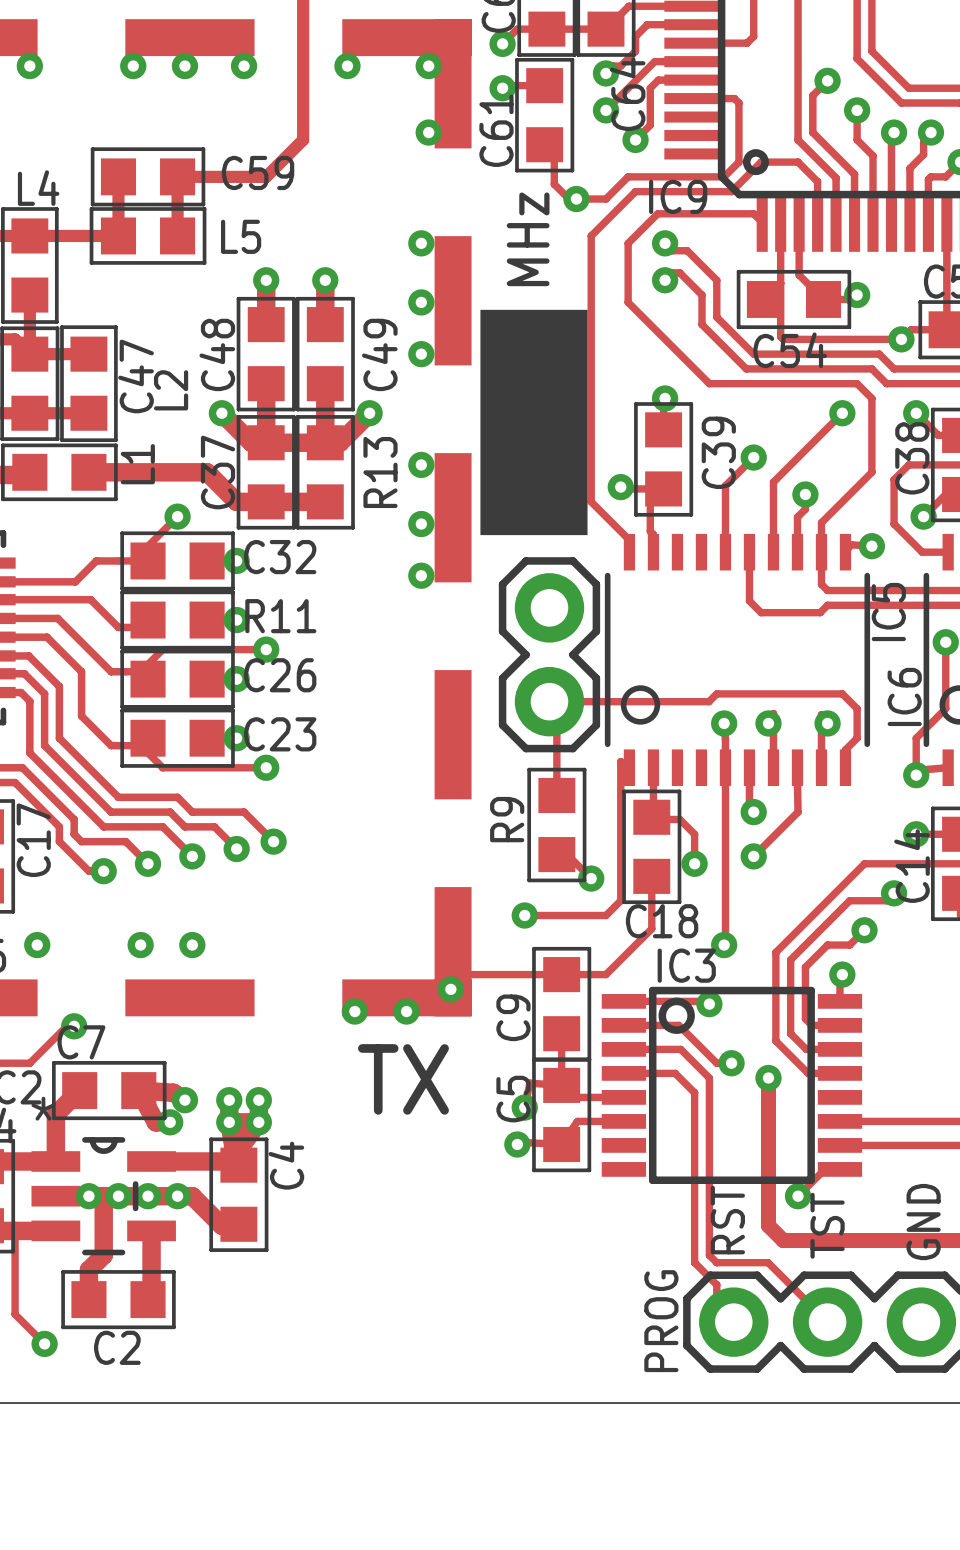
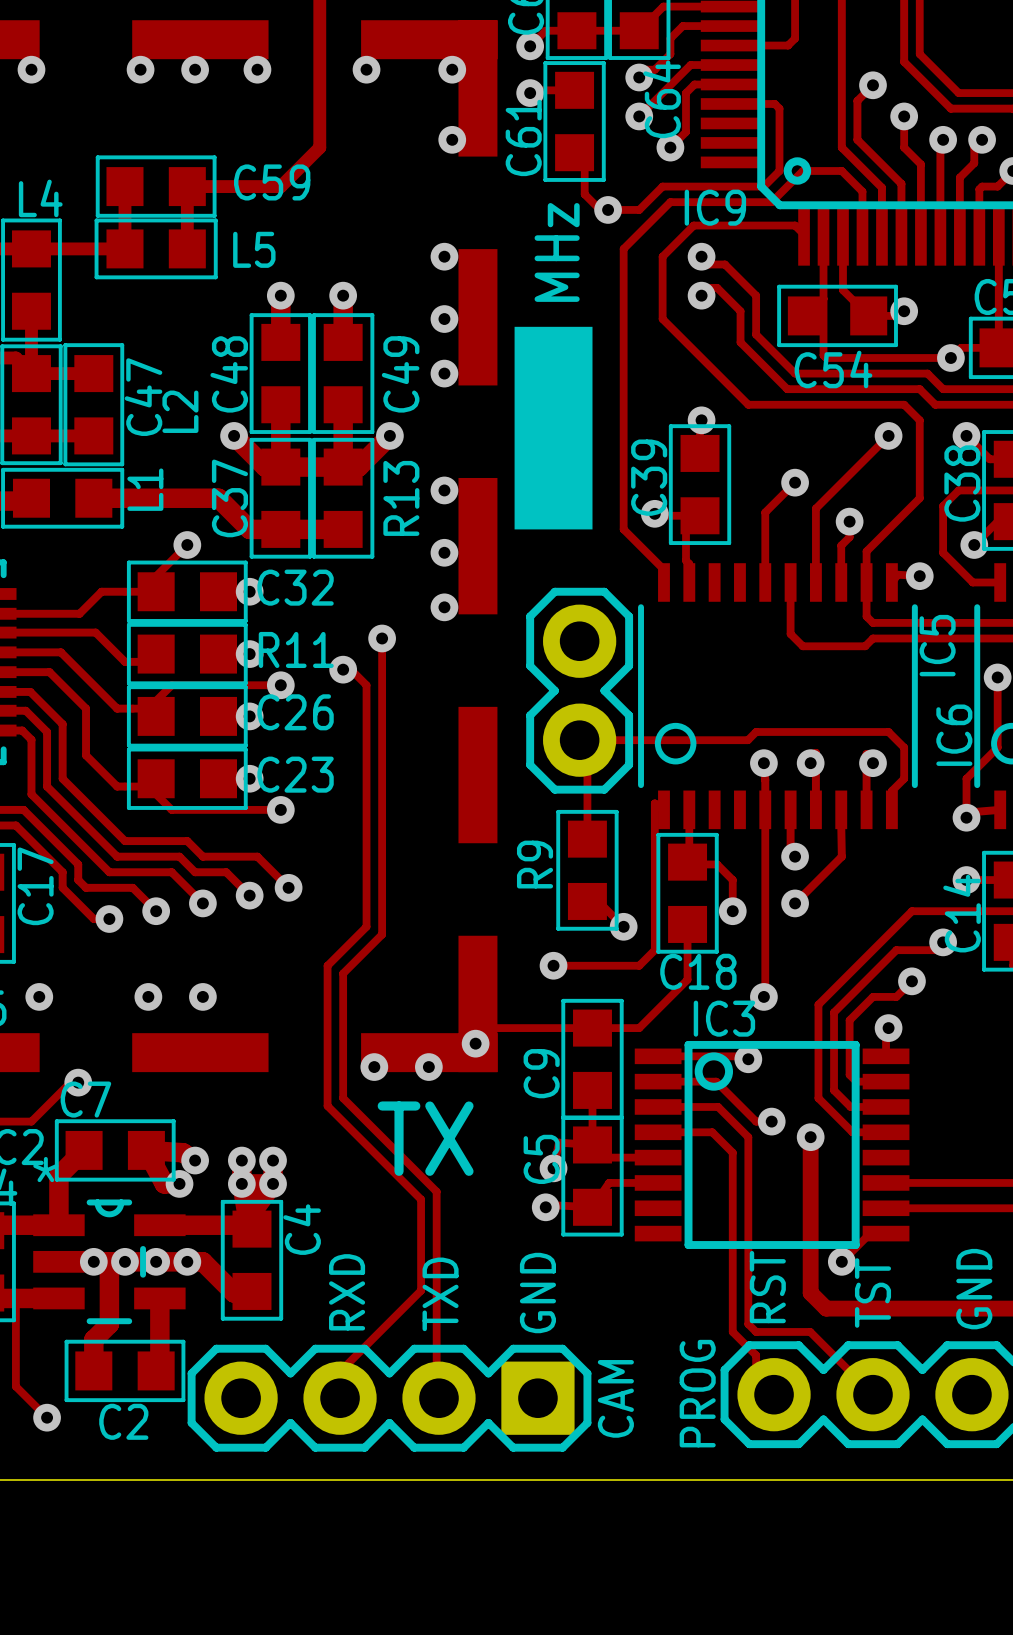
drawing shape: [480, 309, 588, 536] -> [514, 326, 593, 530]
C39 name position: C39 (718, 452) -> C39 (649, 477)
track: none -> (382, 638) (382, 934) (343, 973) (343, 1098) (436, 1191) (436, 1386) (439, 1389) (438, 1398)
via: none -> (382, 638)
track: none -> (343, 669) (350, 669) (366, 685) (366, 926) (327, 965) (327, 1106) (421, 1199) (421, 1290) (340, 1371) (340, 1398)
via: none -> (343, 669)
text: none -> RXD (347, 1292)
text: none -> GND (537, 1293)
text: none -> TXD (440, 1294)
part: none -> (389, 1398)
text: none -> CAM (615, 1398)

